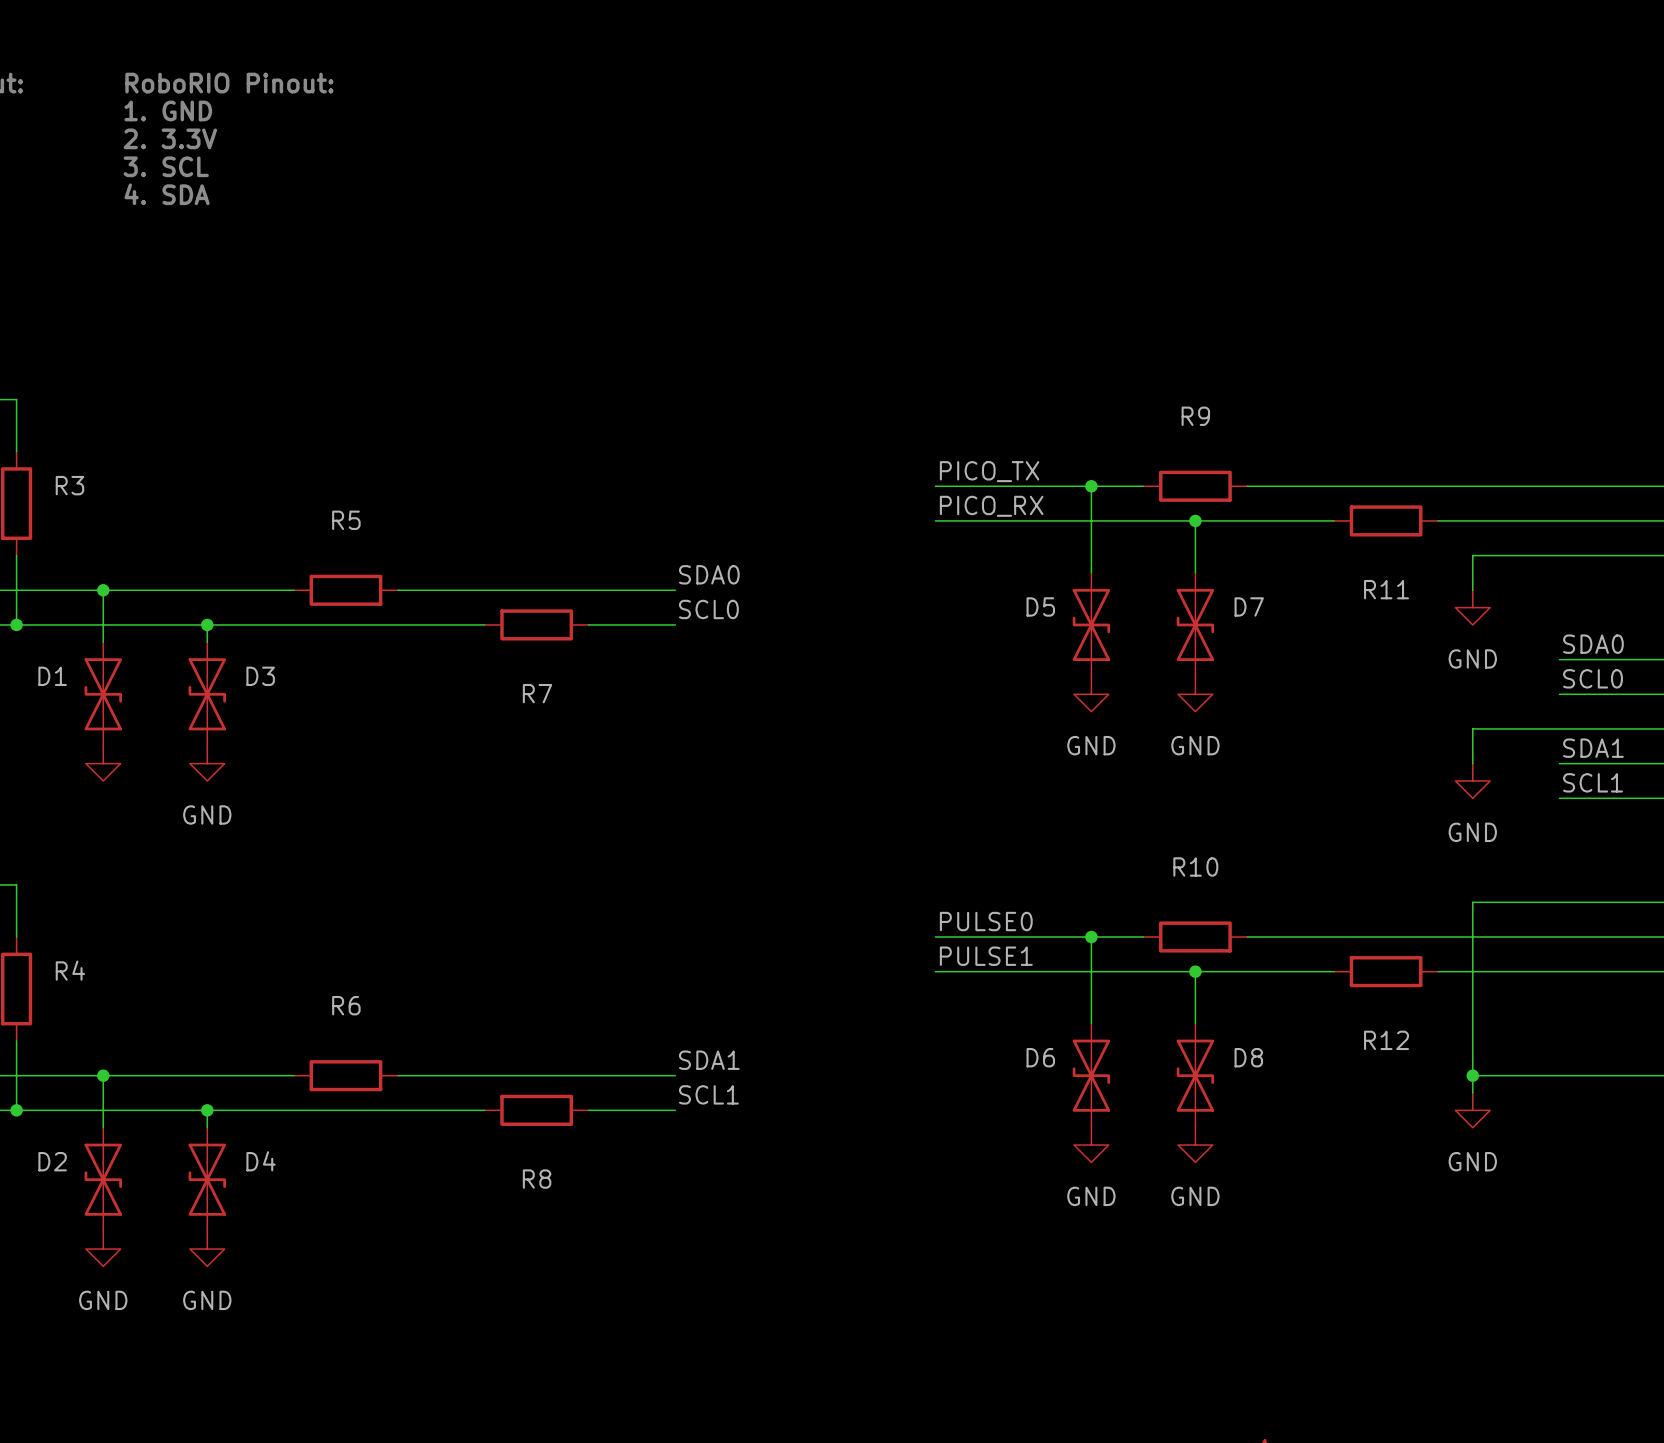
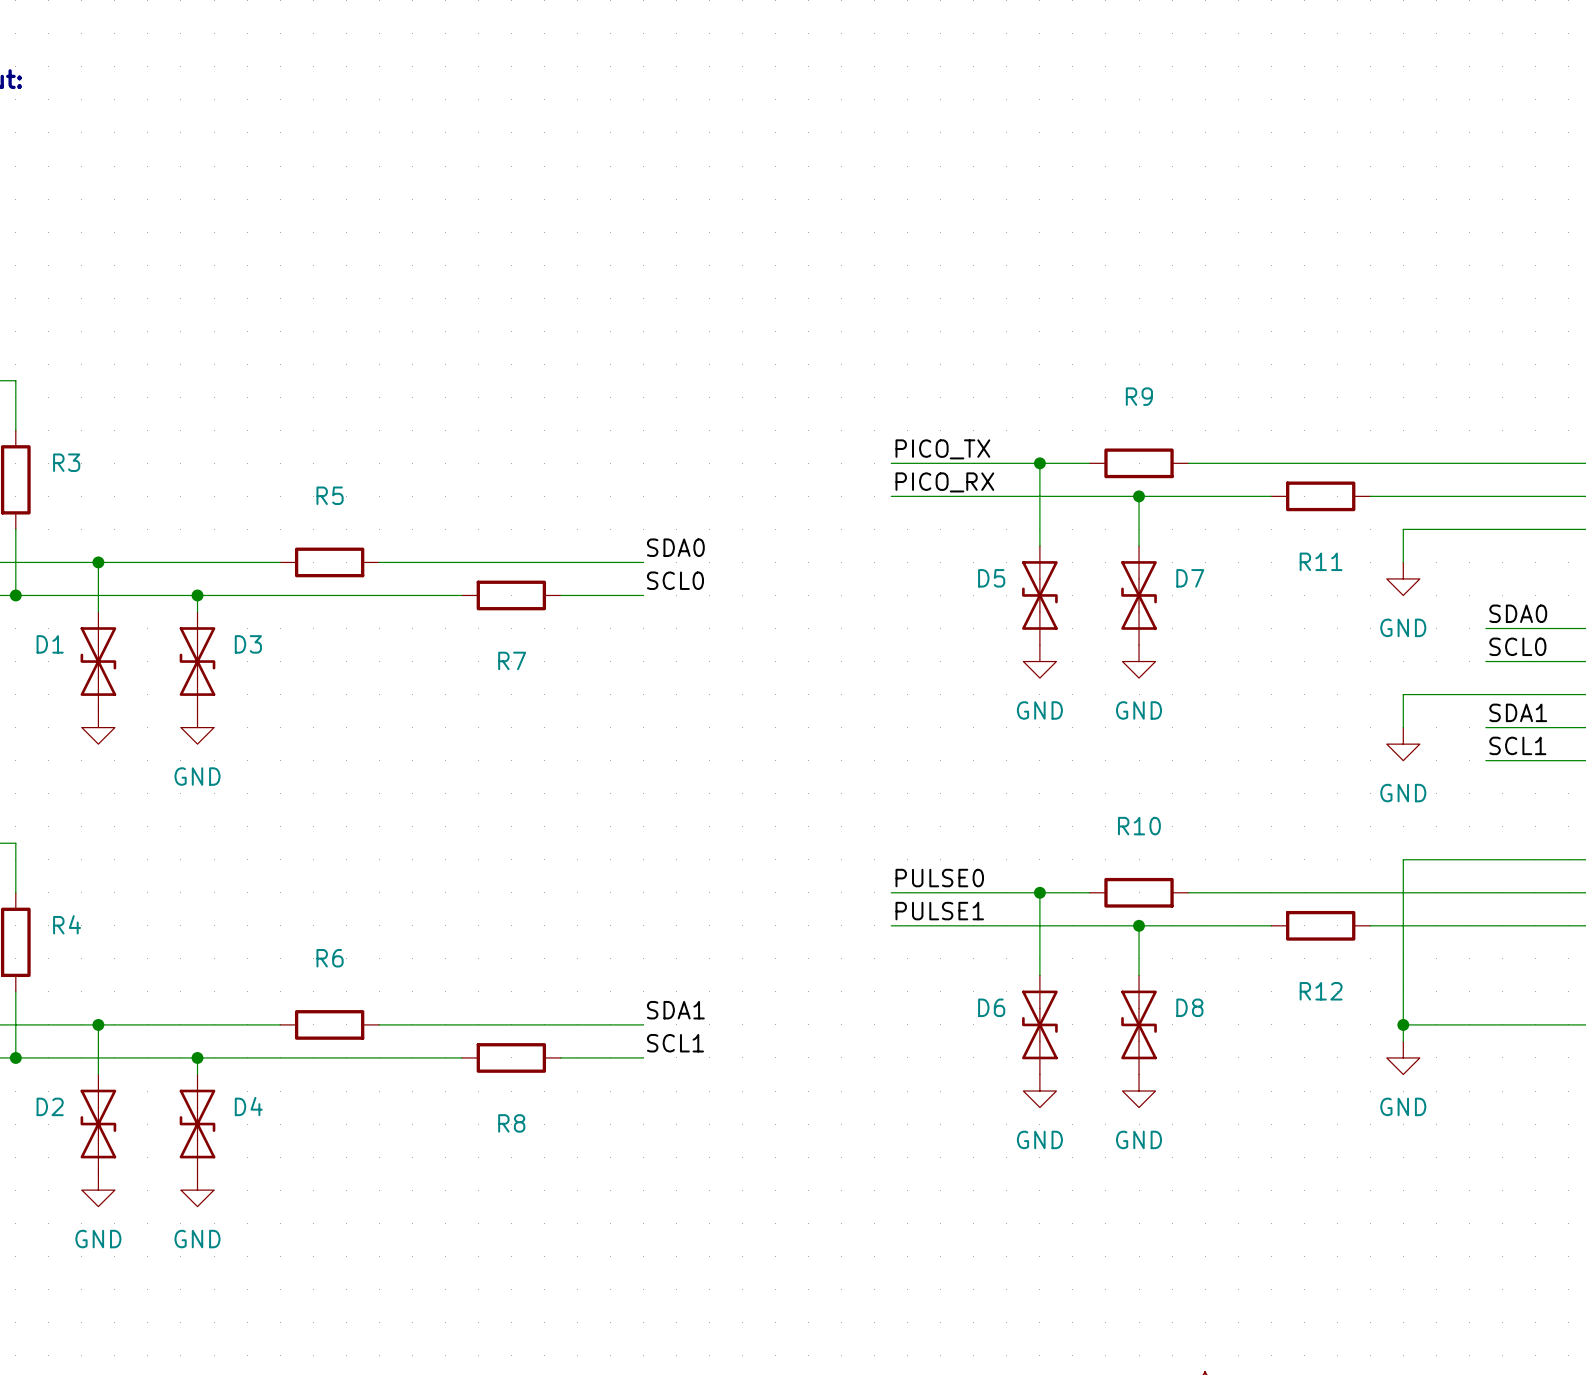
text: RoboRIO Pinout: (229, 83) -> none
text: 1. GND (168, 110) -> none
text: 2. 3.3V (170, 138) -> none
text: 3. SCL (166, 166) -> none
text: 4. SDA (167, 194) -> none

